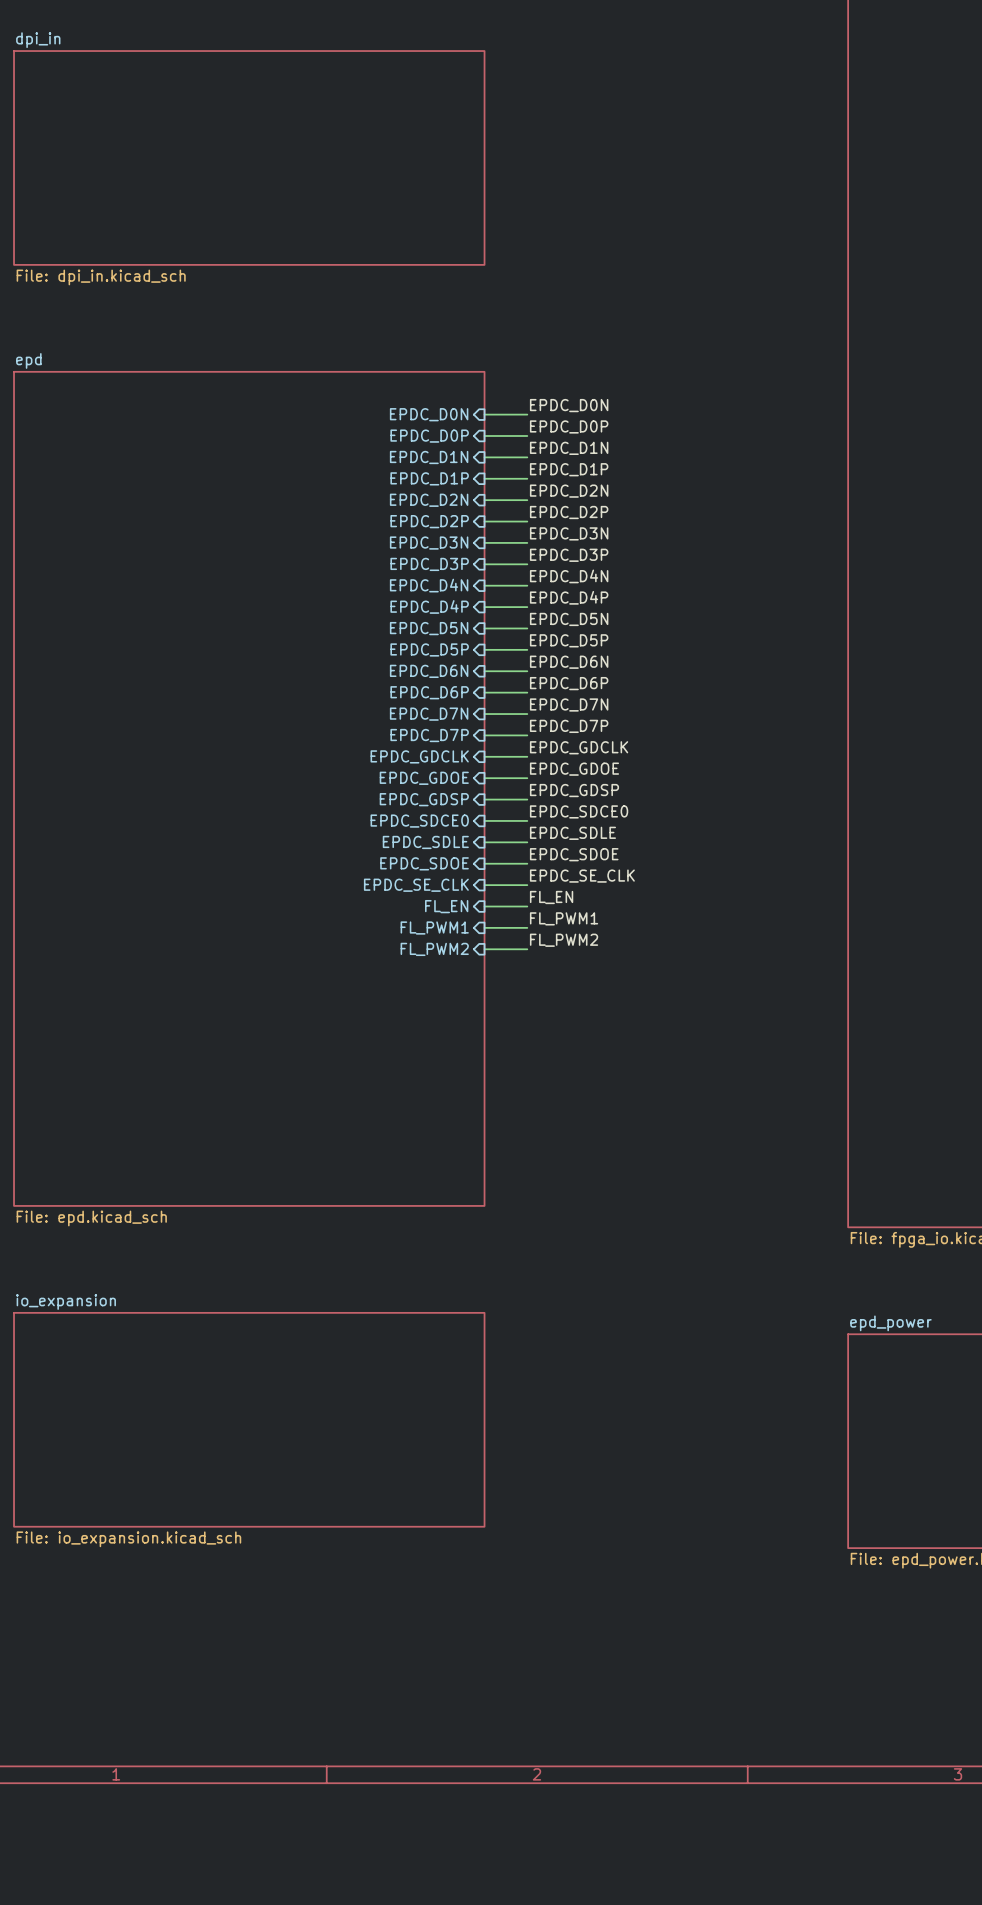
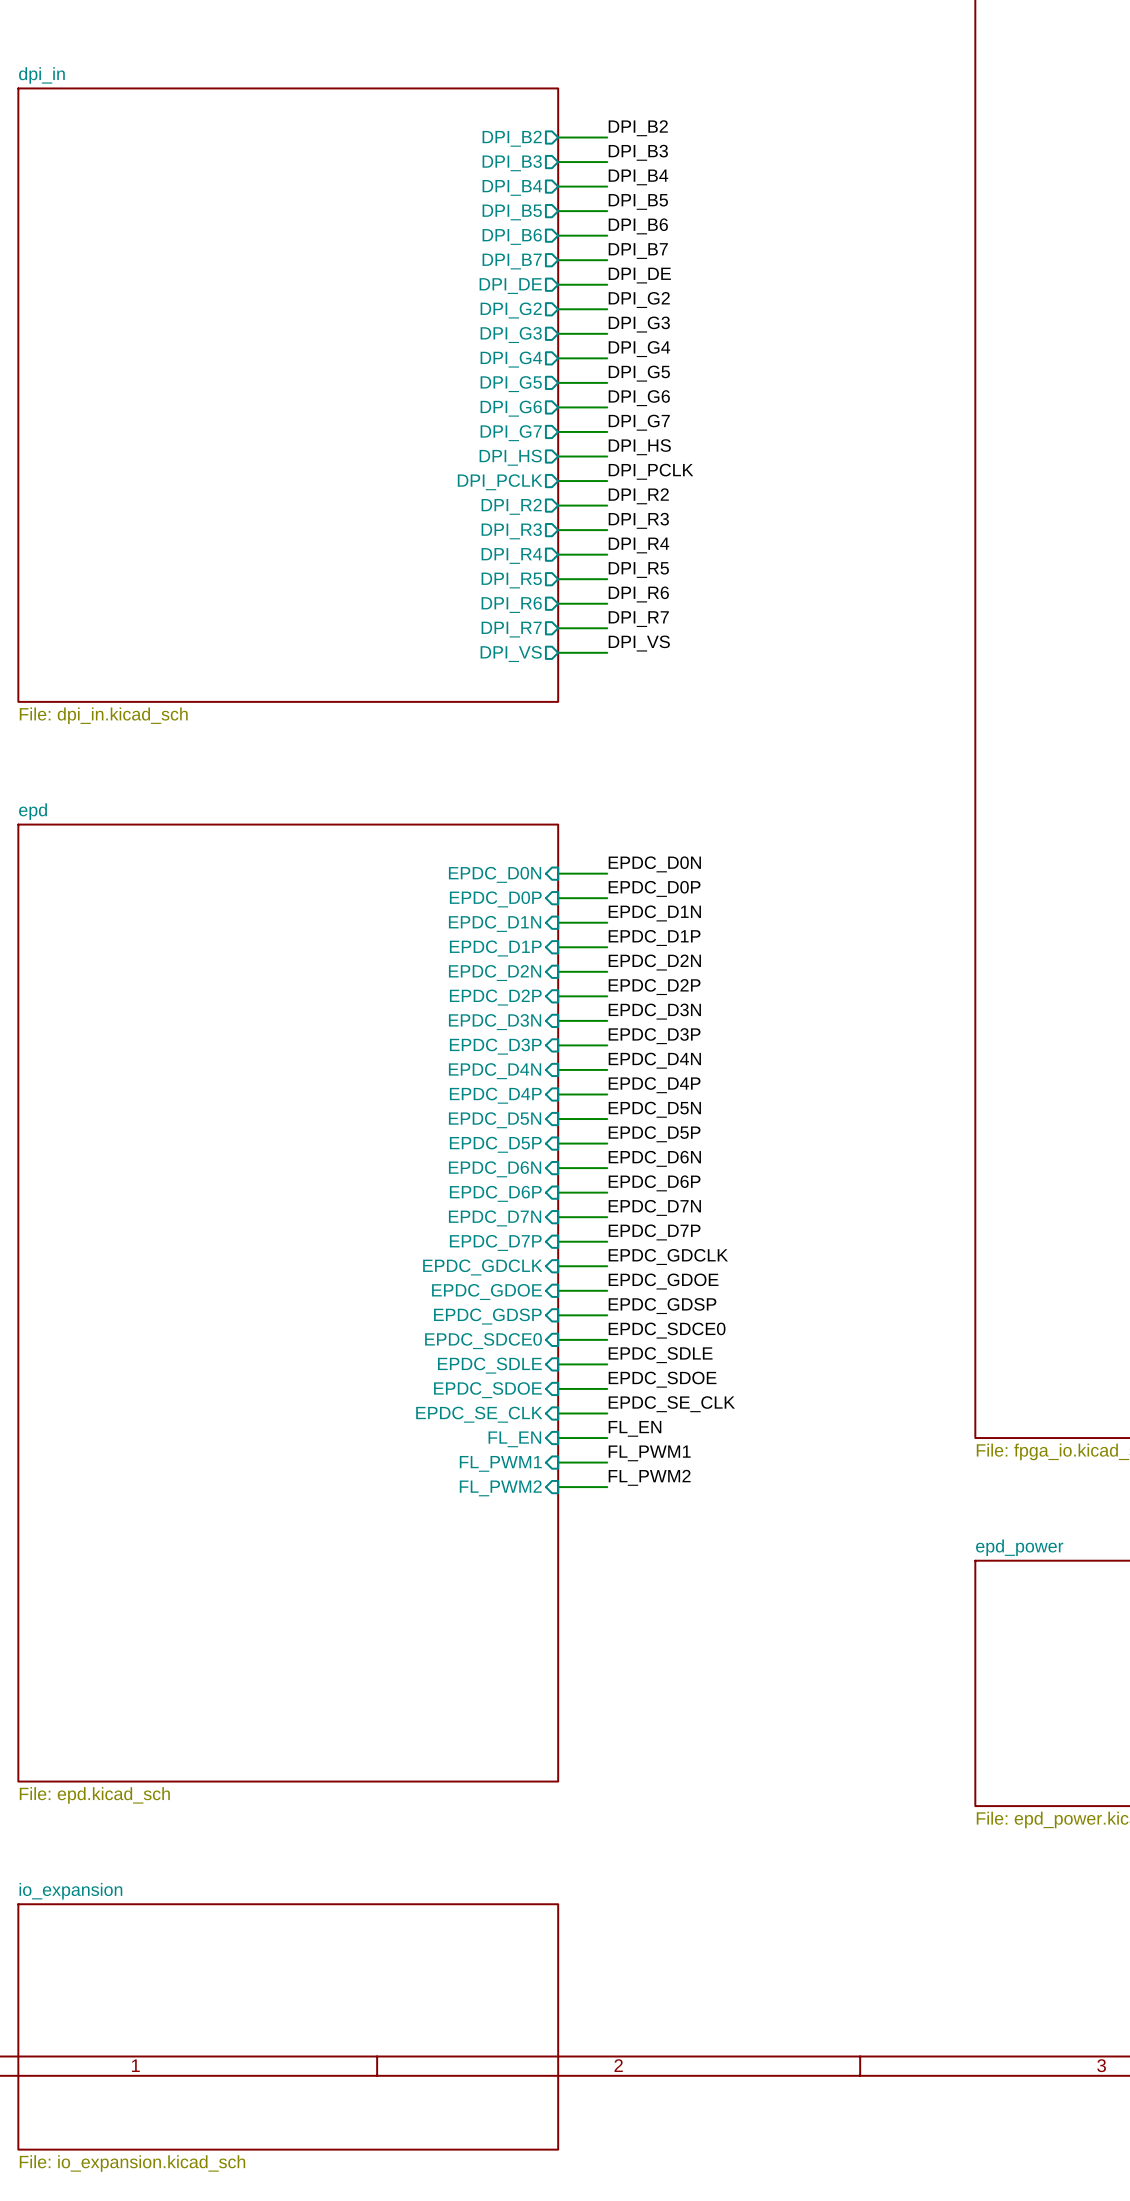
label: none -> DPI_B2 (638, 128)
sheet pin: none -> DPI_B2 (512, 138)
wire: none -> (558, 137) (607, 137)
label: none -> DPI_B3 (638, 152)
sheet pin: none -> DPI_B3 (512, 163)
wire: none -> (558, 162) (607, 162)
label: none -> DPI_B4 (638, 177)
sheet pin: none -> DPI_B4 (512, 187)
wire: none -> (558, 186) (607, 186)
label: none -> DPI_B5 (638, 201)
sheet dpi_in: File: dpi_in.kicad_sch (249, 157) -> none
wire: none -> (558, 211) (607, 211)
sheet pin: none -> DPI_B5 (512, 212)
label: none -> DPI_B6 (638, 226)
sheet pin: none -> DPI_B6 (512, 236)
wire: none -> (558, 235) (607, 235)
label: none -> DPI_B7 (638, 251)
sheet pin: none -> DPI_B7 (512, 261)
wire: none -> (558, 260) (607, 260)
label: none -> DPI_DE (639, 275)
sheet pin: none -> DPI_DE (510, 286)
wire: none -> (558, 284) (607, 284)
label: none -> DPI_G2 (639, 300)
sheet pin: none -> DPI_G2 (511, 310)
wire: none -> (558, 309) (607, 309)
label: none -> DPI_G3 (639, 324)
wire: none -> (558, 333) (607, 333)
sheet pin: none -> DPI_G3 (511, 335)
label: none -> DPI_G4 (639, 349)
sheet pin: none -> DPI_G4 (511, 359)
wire: none -> (558, 358) (607, 358)
label: none -> DPI_G5 (639, 373)
sheet pin: none -> DPI_G5 (511, 384)
wire: none -> (558, 382) (607, 382)
sheet dpi_in: none -> File: dpi_in.kicad_sch (288, 395)
label: none -> DPI_G6 (639, 398)
sheet pin: none -> DPI_G6 (511, 408)
wire: none -> (558, 407) (607, 407)
label: none -> DPI_G7 (639, 422)
sheet pin: none -> DPI_G7 (511, 433)
wire: none -> (558, 431) (607, 431)
label: none -> DPI_HS (639, 447)
sheet pin: none -> DPI_HS (510, 457)
label: none -> DPI_PCLK (651, 471)
sheet pin: none -> DPI_PCLK (500, 482)
label: EPDC_D0N (569, 405) -> DPI_R2 (638, 496)
sheet pin shape: input (429, 414) -> output (511, 506)
sheet pin: EPDC_D0N (429, 414) -> DPI_R2 (511, 506)
label: EPDC_D0P (569, 426) -> DPI_R3 (638, 520)
sheet pin shape: input (429, 436) -> output (511, 531)
sheet pin: EPDC_D0P (429, 436) -> DPI_R3 (511, 531)
label: EPDC_D1N (569, 448) -> DPI_R4 (638, 545)
sheet pin shape: input (429, 457) -> output (511, 555)
sheet pin: EPDC_D1N (429, 457) -> DPI_R4 (511, 555)
label: EPDC_D1P (569, 469) -> DPI_R5 (638, 570)
sheet pin shape: input (429, 478) -> output (511, 580)
sheet pin: EPDC_D1P (429, 478) -> DPI_R5 (511, 580)
label: EPDC_D2N (569, 491) -> DPI_R6 (638, 594)
sheet pin shape: input (429, 500) -> output (511, 604)
sheet pin: EPDC_D2N (429, 500) -> DPI_R6 (511, 604)
label: EPDC_D2P (569, 512) -> DPI_R7 (638, 619)
sheet pin shape: input (429, 521) -> output (511, 629)
sheet pin: EPDC_D2P (429, 521) -> DPI_R7 (511, 629)
label: EPDC_D3N (569, 533) -> DPI_VS (639, 643)
sheet pin shape: input (429, 543) -> output (511, 654)
sheet pin: EPDC_D3N (429, 543) -> DPI_VS (511, 654)
label: EPDC_D3P (569, 555) -> none
sheet pin: EPDC_D3P (429, 564) -> none
wire: (484, 564) (527, 564) -> (558, 456) (607, 456)
label: EPDC_D4N (569, 576) -> none
sheet pin: EPDC_D4N (429, 585) -> none
wire: (484, 585) (527, 585) -> (558, 481) (607, 481)
label: EPDC_D4P (569, 597) -> none
sheet pin: EPDC_D4P (429, 606) -> none
wire: (484, 607) (527, 607) -> none
label: EPDC_D5N (569, 619) -> none
sheet pin: EPDC_D5N (429, 628) -> none
wire: (484, 628) (527, 628) -> none
label: EPDC_D5P (569, 640) -> none
sheet pin: EPDC_D5P (429, 649) -> none
wire: (484, 649) (527, 649) -> none
label: EPDC_D6N (569, 662) -> none
sheet pin: EPDC_D6N (429, 671) -> none
wire: (484, 671) (527, 671) -> none
label: EPDC_D6P (569, 683) -> none
sheet pin: EPDC_D6P (429, 692) -> none
wire: (484, 692) (527, 692) -> none
label: EPDC_D7N (569, 704) -> none
sheet pin: EPDC_D7N (429, 714) -> none
wire: (484, 714) (527, 714) -> none
label: EPDC_D7P (569, 726) -> EPDC_D0N (654, 864)
sheet pin: EPDC_D7P (429, 735) -> EPDC_D0N (495, 874)
label: EPDC_GDCLK (579, 747) -> EPDC_D0P (654, 888)
sheet pin: EPDC_GDCLK (419, 756) -> EPDC_D0P (495, 899)
label: EPDC_GDOE (574, 769) -> EPDC_D1N (654, 913)
sheet pin: EPDC_GDOE (424, 778) -> EPDC_D1N (495, 923)
sheet epd: File: epd.kicad_sch (249, 788) -> none
label: EPDC_GDSP (574, 790) -> EPDC_D1P (654, 937)
sheet pin: EPDC_GDSP (424, 799) -> EPDC_D1P (495, 948)
label: EPDC_SDCE0 (579, 811) -> EPDC_D2N (654, 962)
sheet pin: EPDC_SDCE0 (419, 821) -> EPDC_D2N (495, 973)
label: EPDC_SDLE (572, 833) -> EPDC_D2P (654, 987)
sheet pin: EPDC_SDLE (425, 842) -> EPDC_D2P (495, 997)
label: EPDC_SDOE (574, 854) -> EPDC_D3N (654, 1011)
sheet pin: EPDC_SDOE (424, 863) -> EPDC_D3N (495, 1022)
label: EPDC_SE_CLK (582, 876) -> EPDC_D3P (654, 1036)
sheet pin: EPDC_SE_CLK (416, 885) -> EPDC_D3P (495, 1046)
label: FL_EN (551, 897) -> EPDC_D4N (654, 1060)
sheet pin: FL_EN (446, 906) -> EPDC_D4N (495, 1071)
label: FL_PWM1 (564, 918) -> EPDC_D4P (654, 1085)
sheet pin: FL_PWM1 (434, 928) -> EPDC_D4P (495, 1095)
label: FL_PWM2 (564, 940) -> EPDC_D5N (654, 1109)
sheet pin: FL_PWM2 (434, 949) -> EPDC_D5N (495, 1120)
label: none -> EPDC_D5P (654, 1134)
sheet pin: none -> EPDC_D5P (495, 1144)
wire: none -> (558, 1143) (607, 1143)
label: none -> EPDC_D6N (654, 1158)
sheet pin: none -> EPDC_D6N (495, 1169)
wire: none -> (558, 1168) (607, 1168)
label: none -> EPDC_D6P (654, 1183)
sheet pin: none -> EPDC_D6P (495, 1193)
wire: none -> (558, 1192) (607, 1192)
label: none -> EPDC_D7N (654, 1207)
sheet pin: none -> EPDC_D7N (495, 1218)
wire: none -> (558, 1217) (607, 1217)
label: none -> EPDC_D7P (654, 1232)
sheet pin: none -> EPDC_D7P (495, 1242)
wire: none -> (558, 1241) (607, 1241)
label: none -> EPDC_GDCLK (668, 1256)
sheet pin: none -> EPDC_GDCLK (482, 1267)
wire: none -> (558, 1266) (607, 1266)
label: none -> EPDC_GDOE (663, 1281)
wire: none -> (558, 1290) (607, 1290)
sheet pin: none -> EPDC_GDOE (486, 1292)
sheet epd: none -> File: epd.kicad_sch (288, 1303)
label: none -> EPDC_GDSP (662, 1306)
sheet pin: none -> EPDC_GDSP (487, 1316)
wire: none -> (558, 1315) (607, 1315)
label: none -> EPDC_SDCE0 (667, 1330)
sheet pin: none -> EPDC_SDCE0 (483, 1341)
wire: none -> (558, 1339) (607, 1339)
label: none -> EPDC_SDLE (660, 1355)
sheet pin: none -> EPDC_SDLE (489, 1365)
wire: none -> (558, 1364) (607, 1364)
label: none -> EPDC_SDOE (662, 1379)
sheet pin: none -> EPDC_SDOE (487, 1390)
wire: none -> (558, 1388) (607, 1388)
label: none -> EPDC_SE_CLK (671, 1404)
wire: none -> (558, 1413) (607, 1413)
sheet pin: none -> EPDC_SE_CLK (479, 1414)
label: none -> FL_EN (635, 1428)
sheet pin: none -> FL_EN (514, 1439)
wire: none -> (558, 1438) (607, 1438)
label: none -> FL_PWM1 (649, 1453)
sheet pin: none -> FL_PWM1 (500, 1463)
wire: none -> (558, 1462) (607, 1462)
label: none -> FL_PWM2 (649, 1477)
sheet pin: none -> FL_PWM2 (500, 1488)
wire: none -> (558, 1487) (607, 1487)
sheet io_expansion: File: io_expansion.kicad_sch (249, 1419) -> none
sheet io_expansion: none -> File: io_expansion.kicad_sch (288, 2026)

